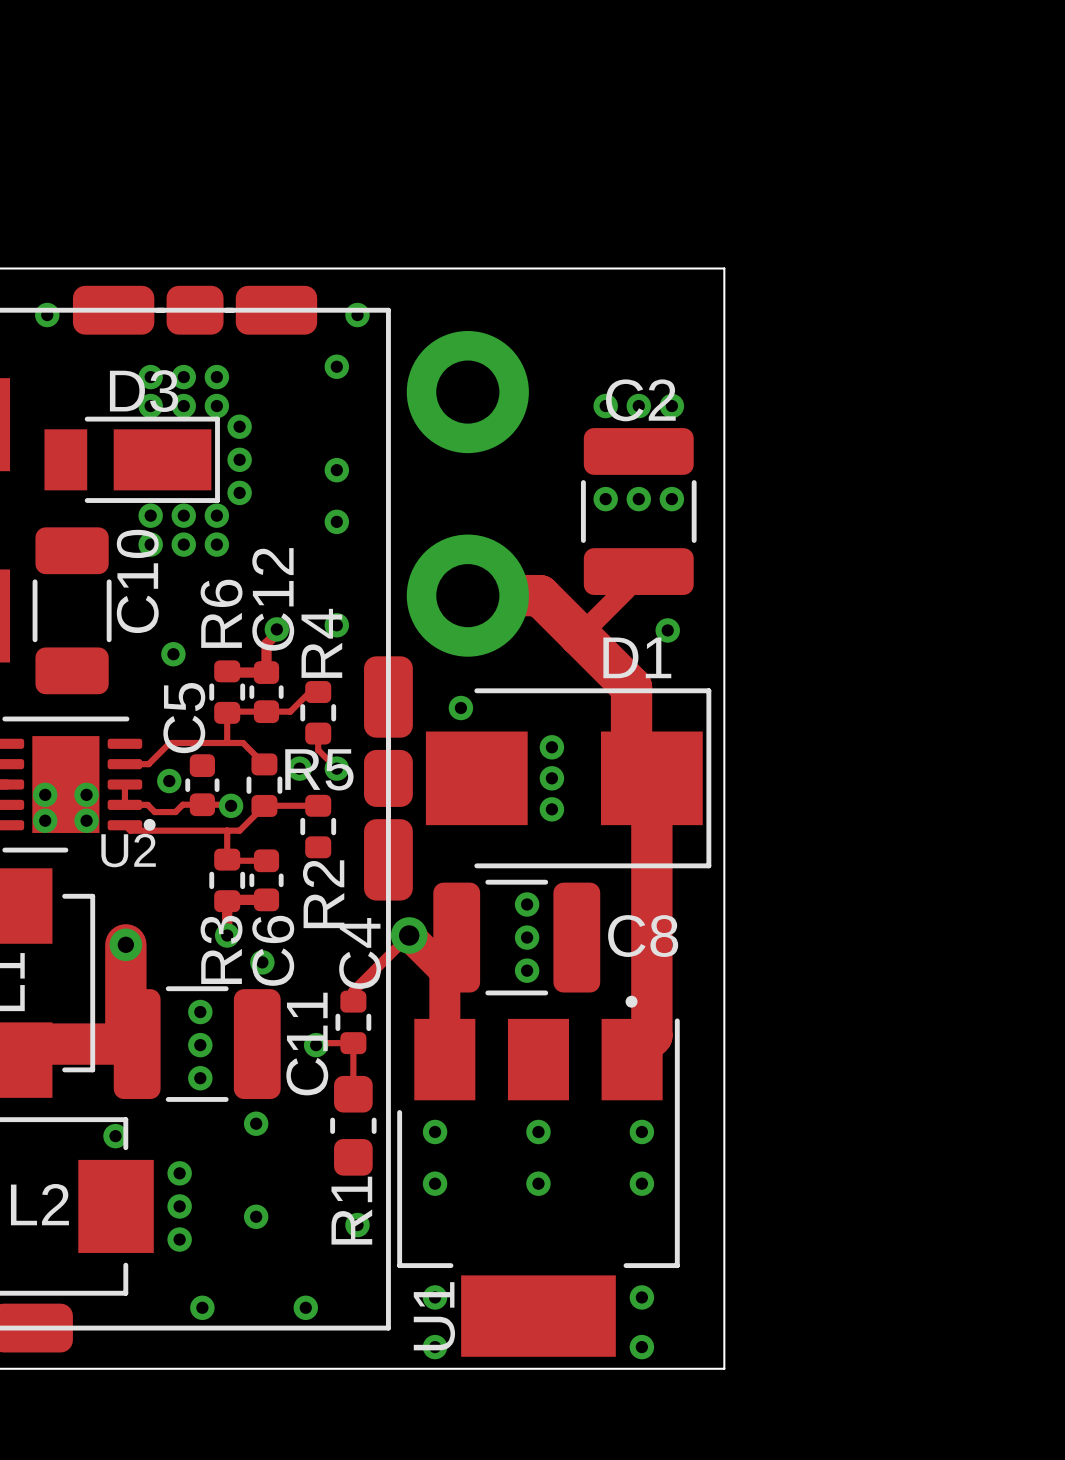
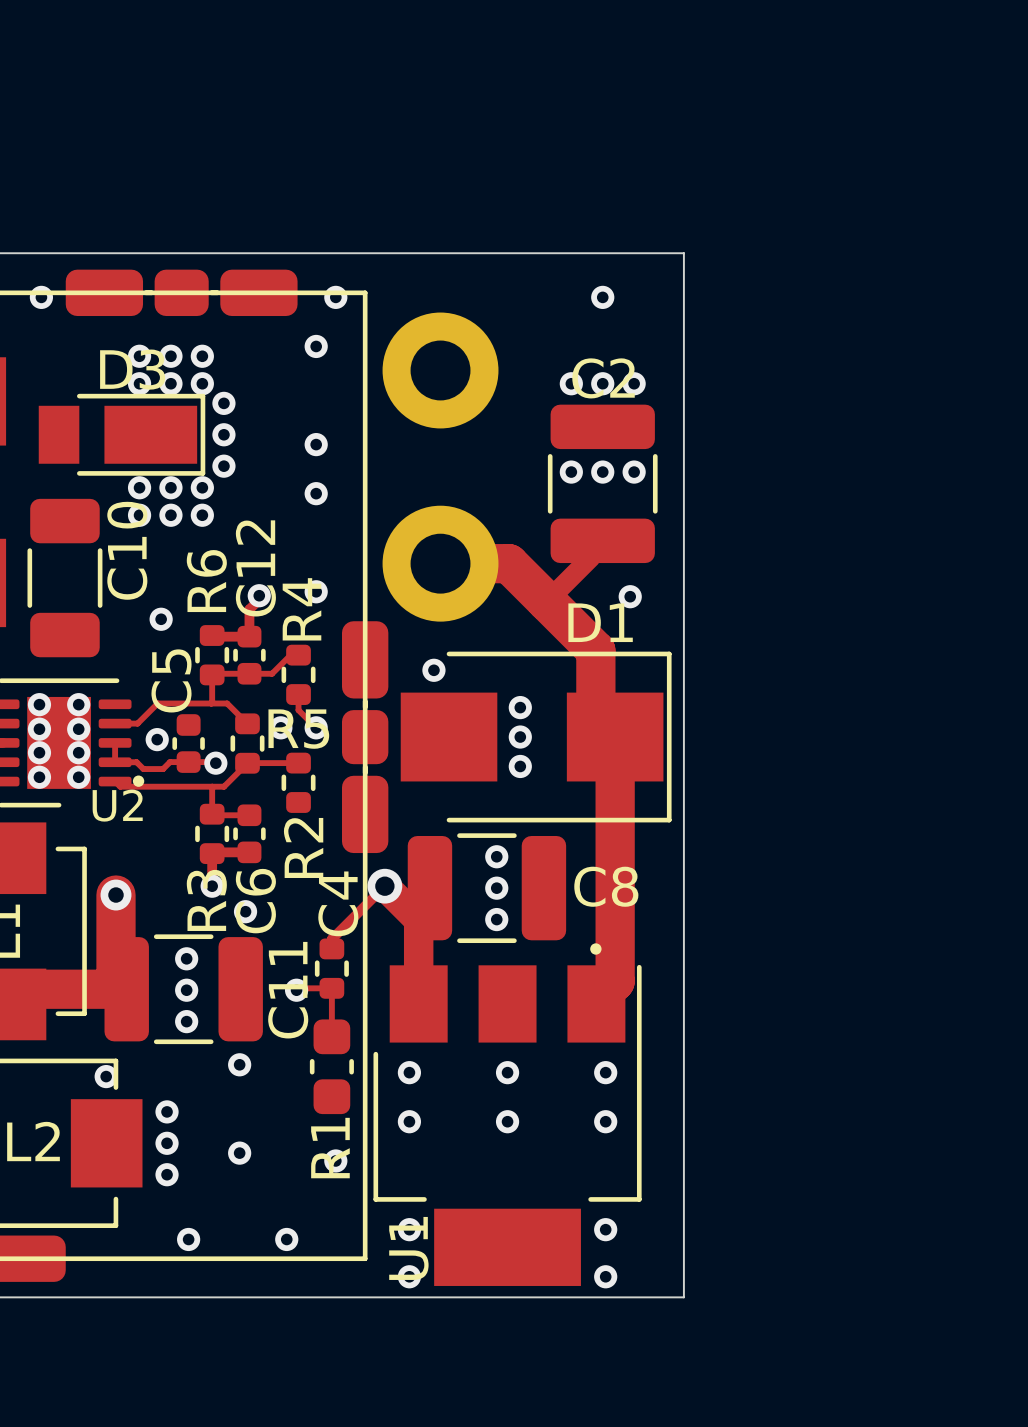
via: none -> (602, 297)
via: none -> (39, 704)
via: none -> (78, 704)
via: none -> (39, 729)
via: none -> (78, 729)

